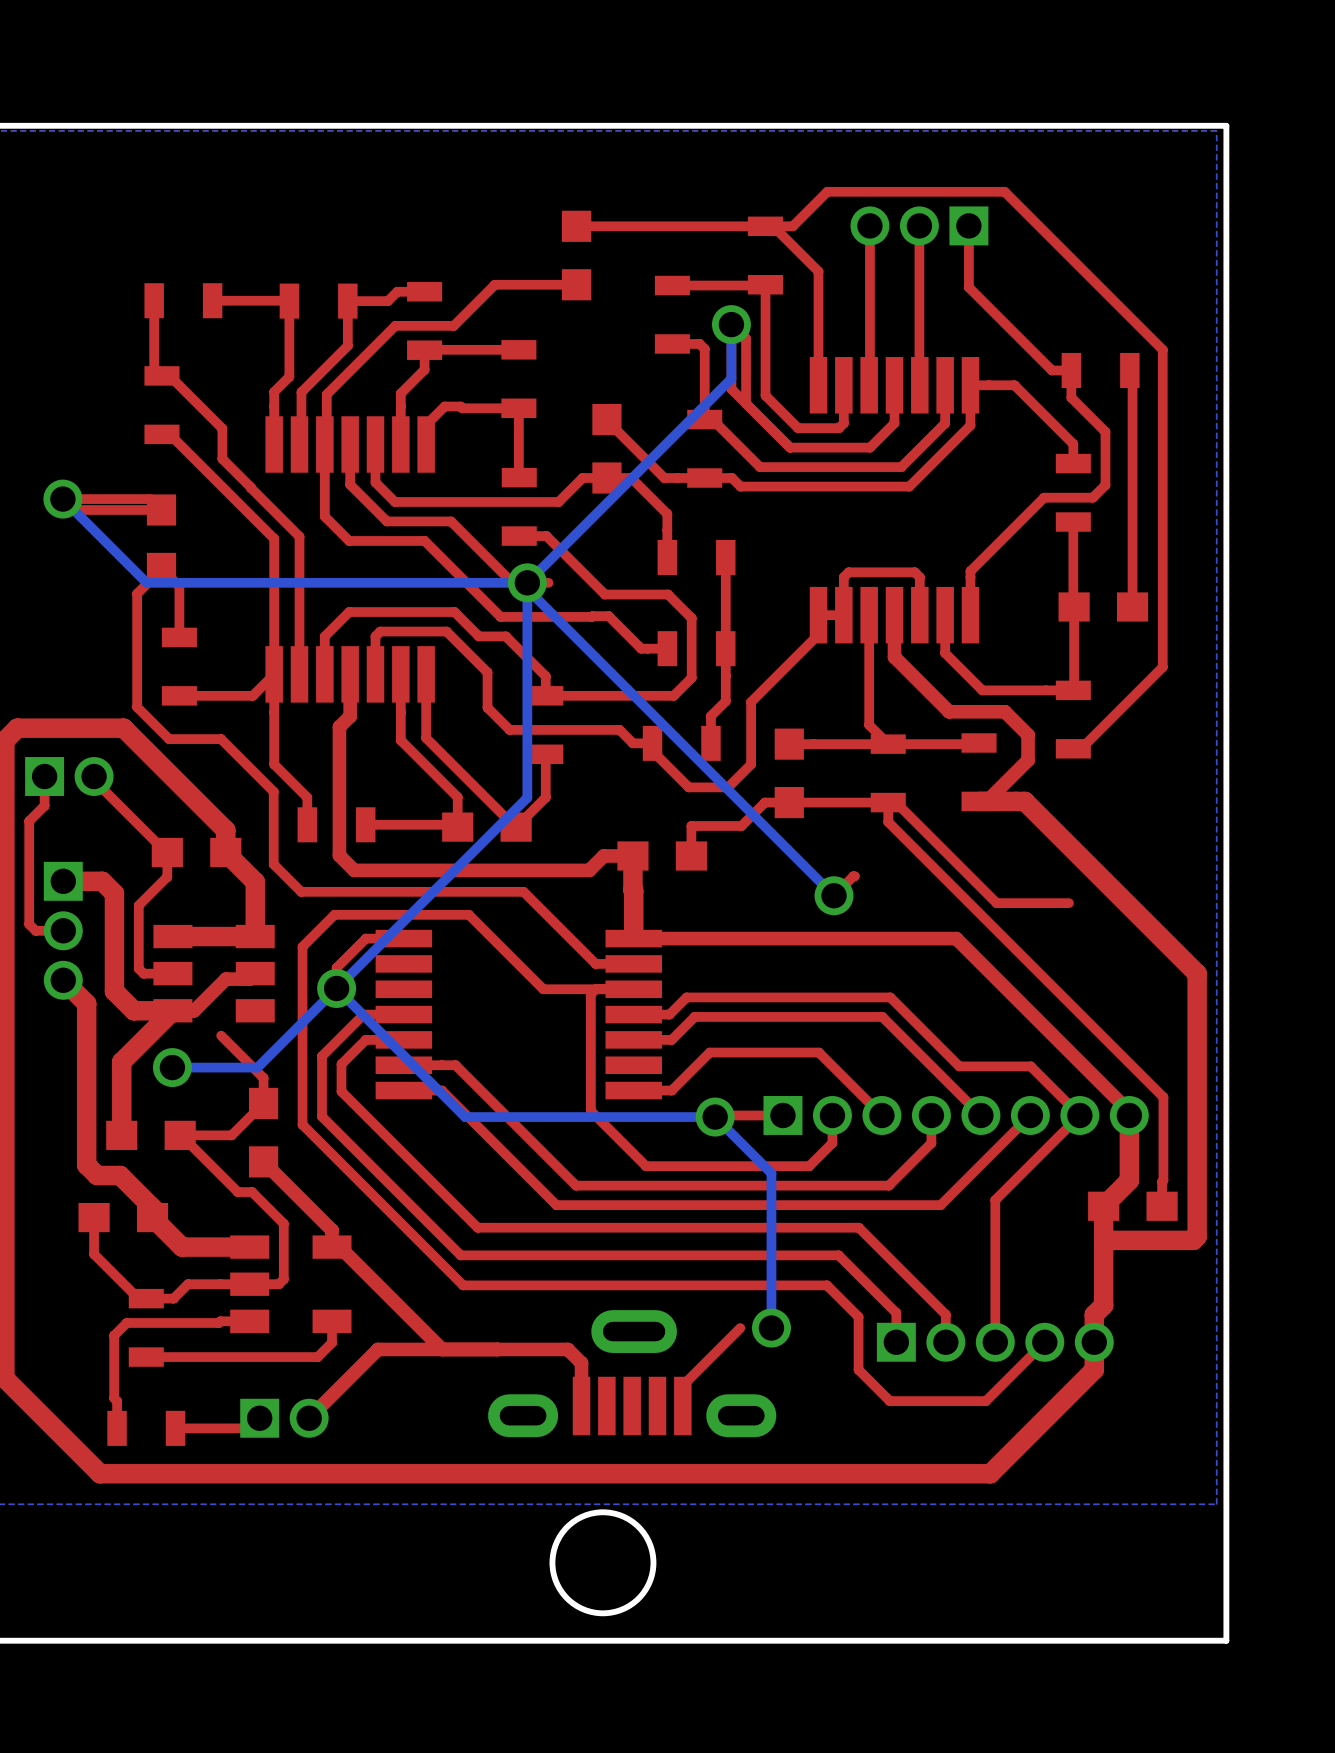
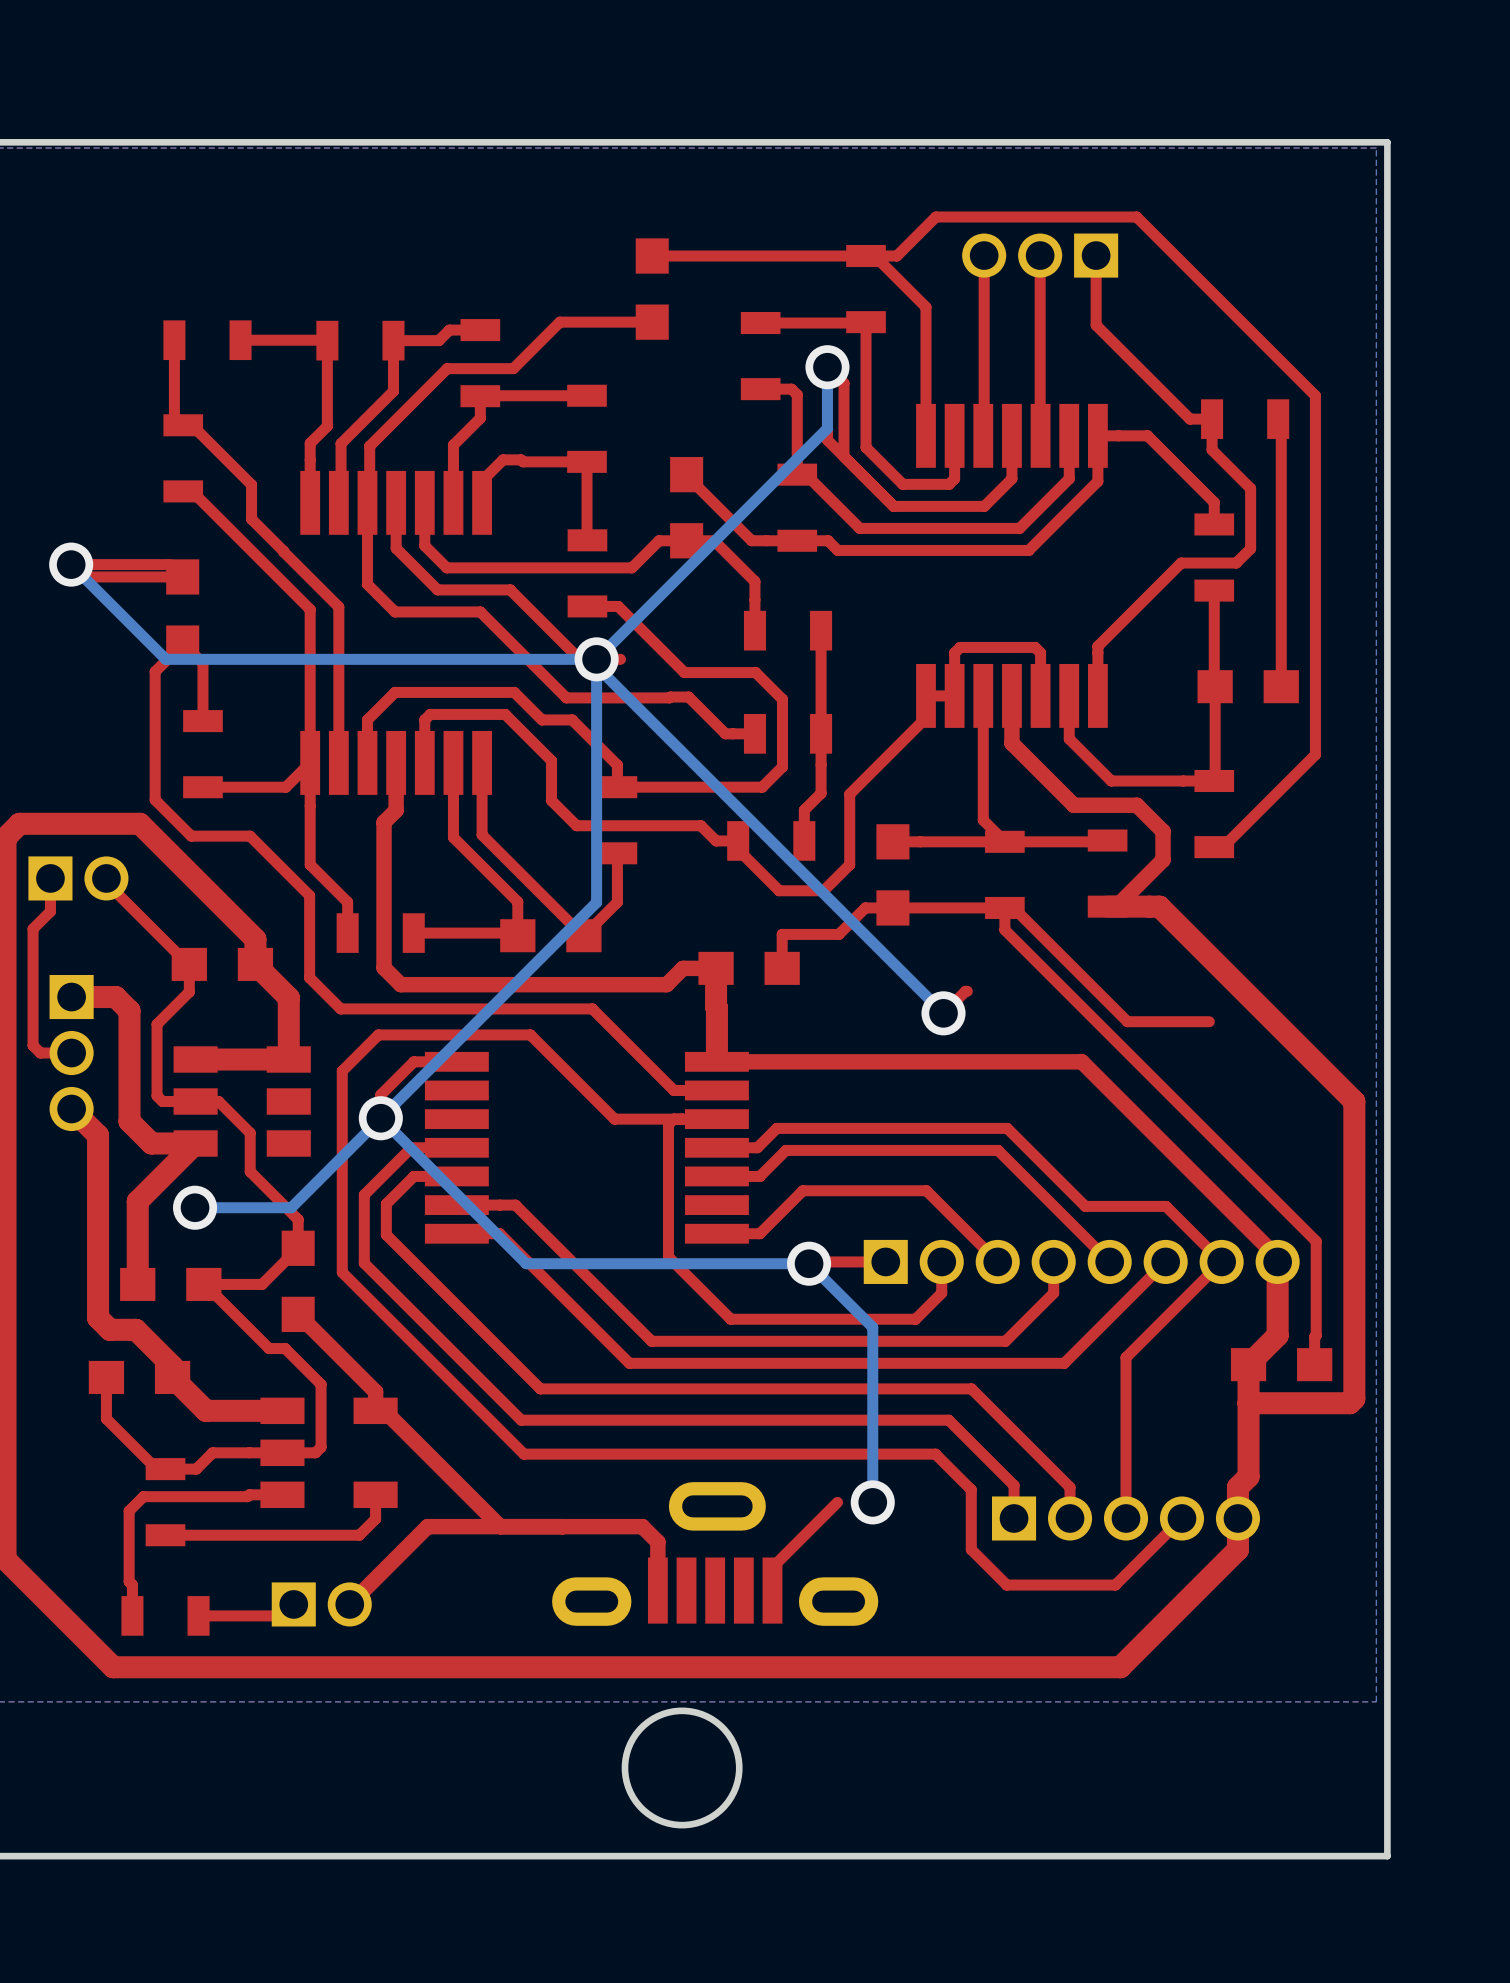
top track: none -> (195, 1101) (218, 1101) (250, 1133) (250, 1171)
top track: (255, 973) (249, 979) (225, 979) (194, 1010) (172, 1010) -> none

